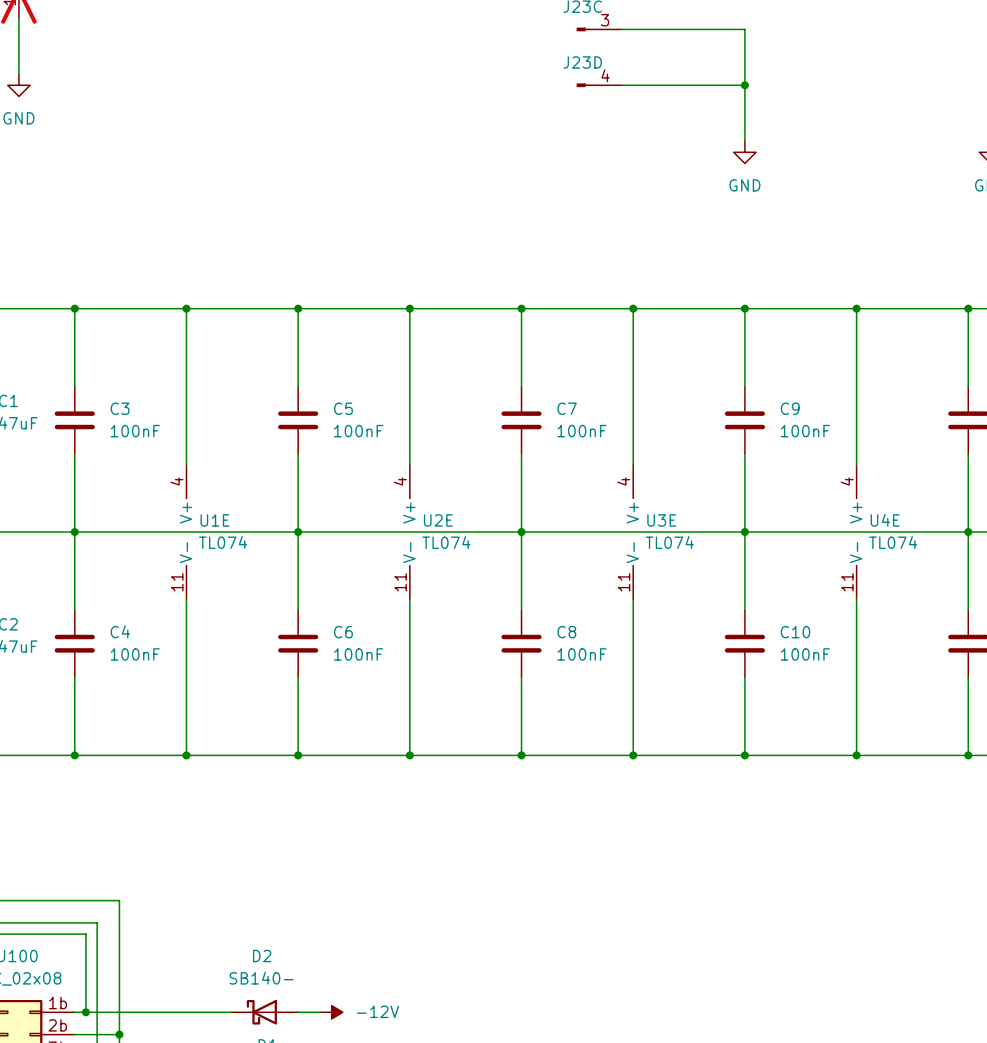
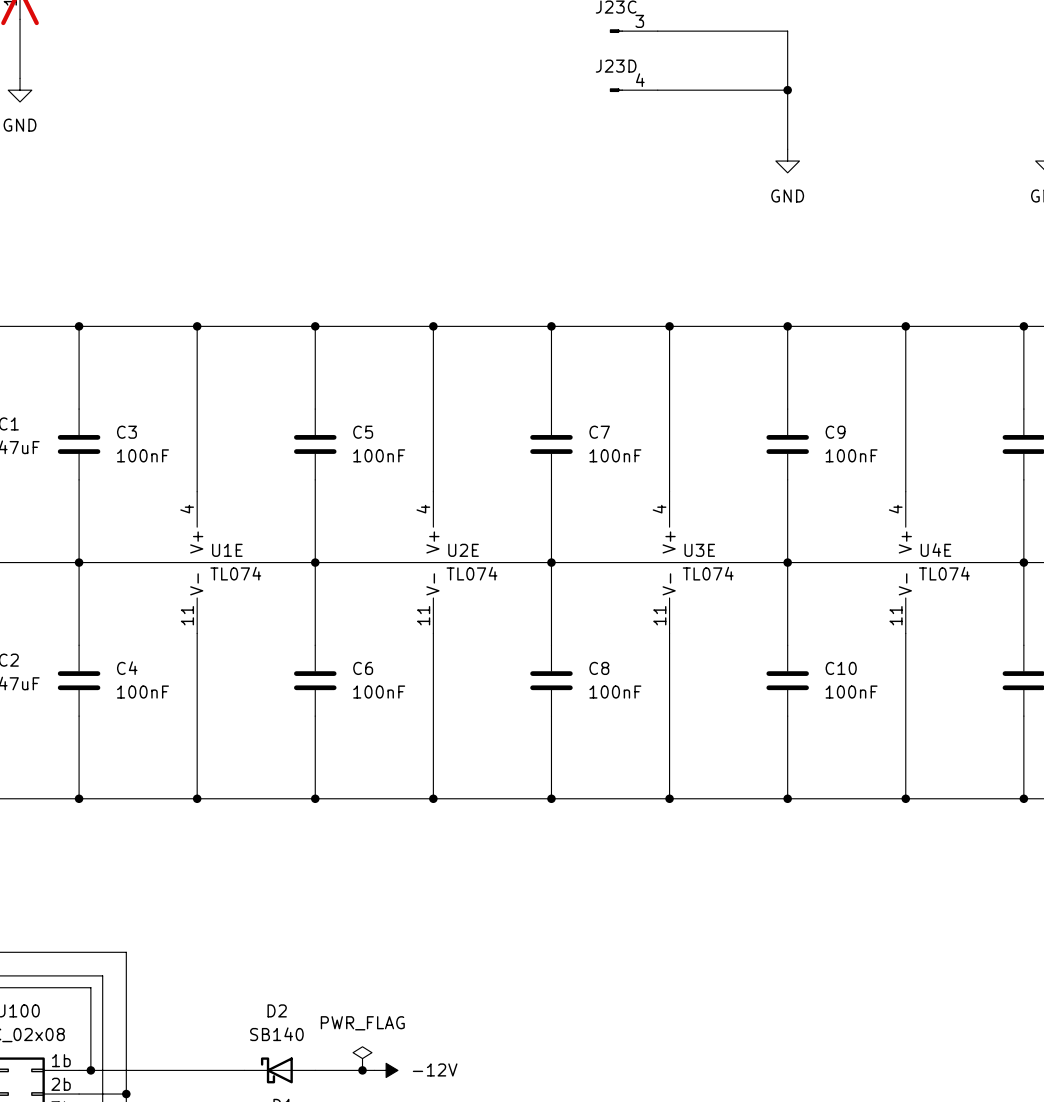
D2 value: SB140- (261, 978) -> SB140 (276, 1034)
power symbol: none -> PWR_FLAG (362, 1058)
power symbol position: -12V (331, 1012) -> -12V (386, 1070)
junction: none -> (362, 1070)

